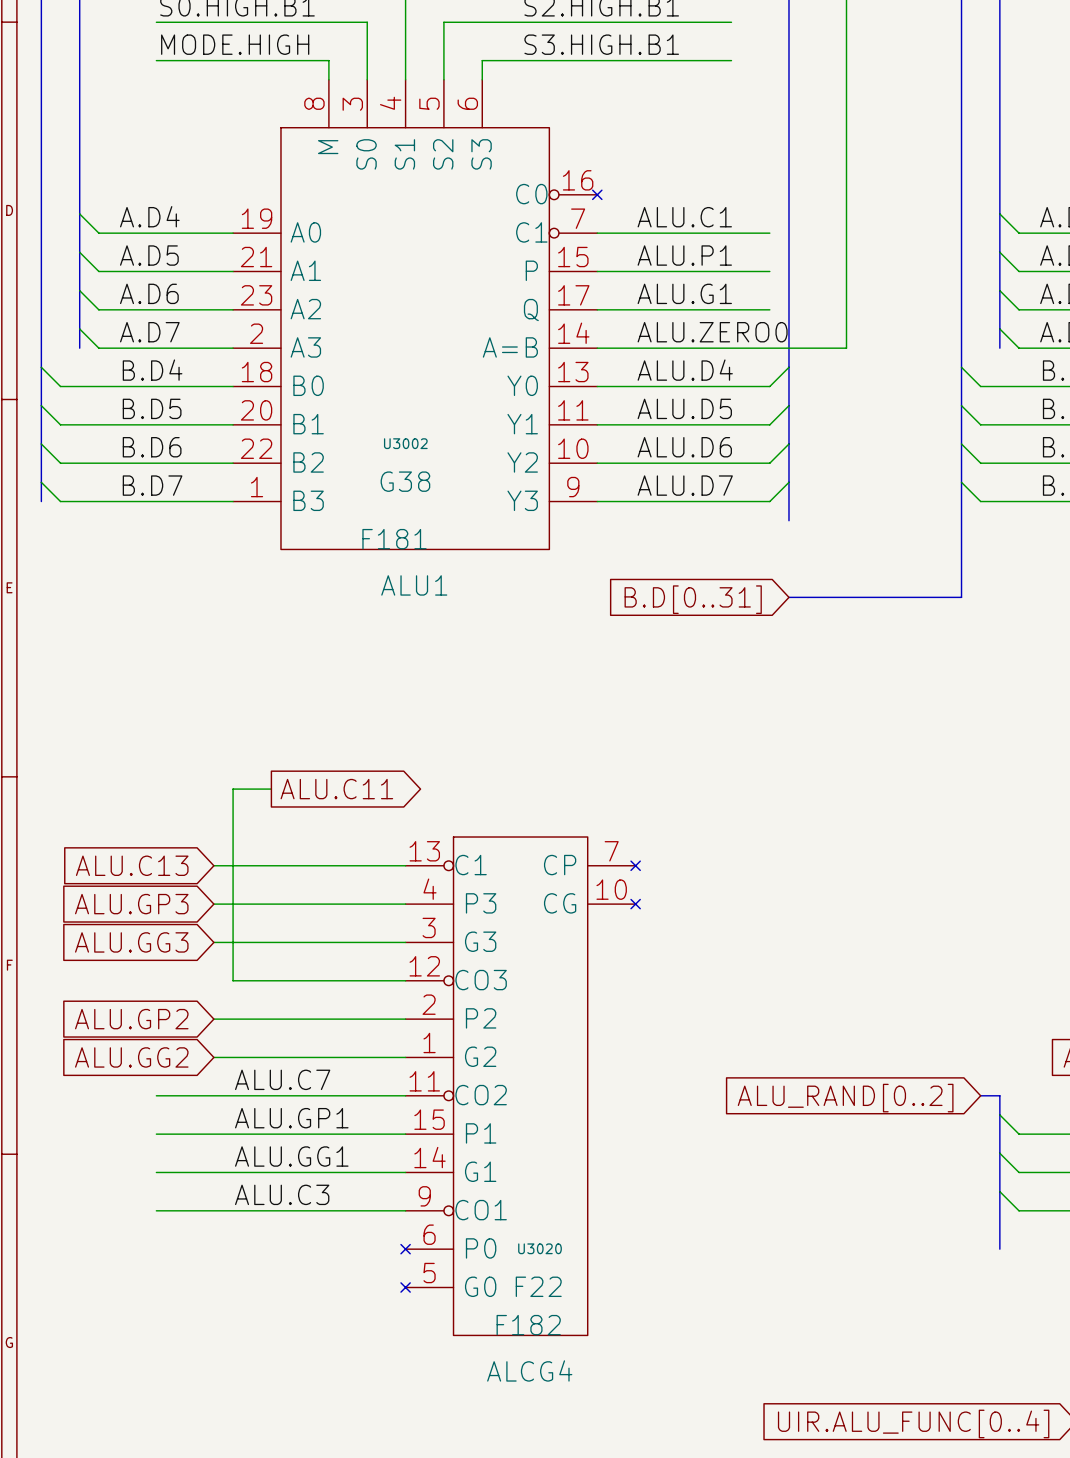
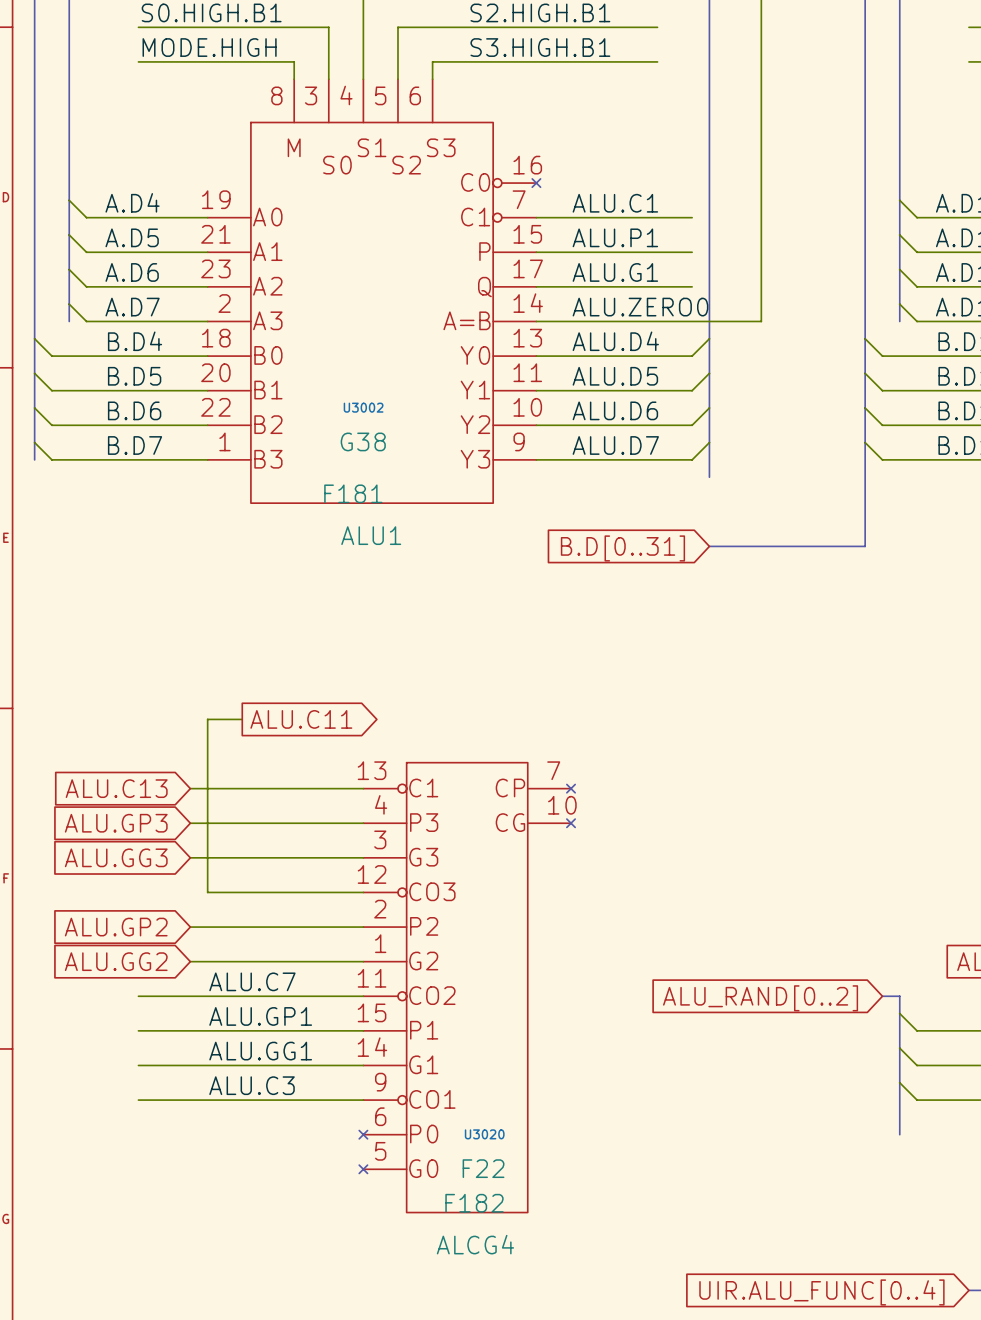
U3002 symbol: [233, 79, 598, 550] -> [207, 79, 537, 504]
U3020 symbol: [405, 837, 636, 1336] -> [363, 762, 572, 1213]

